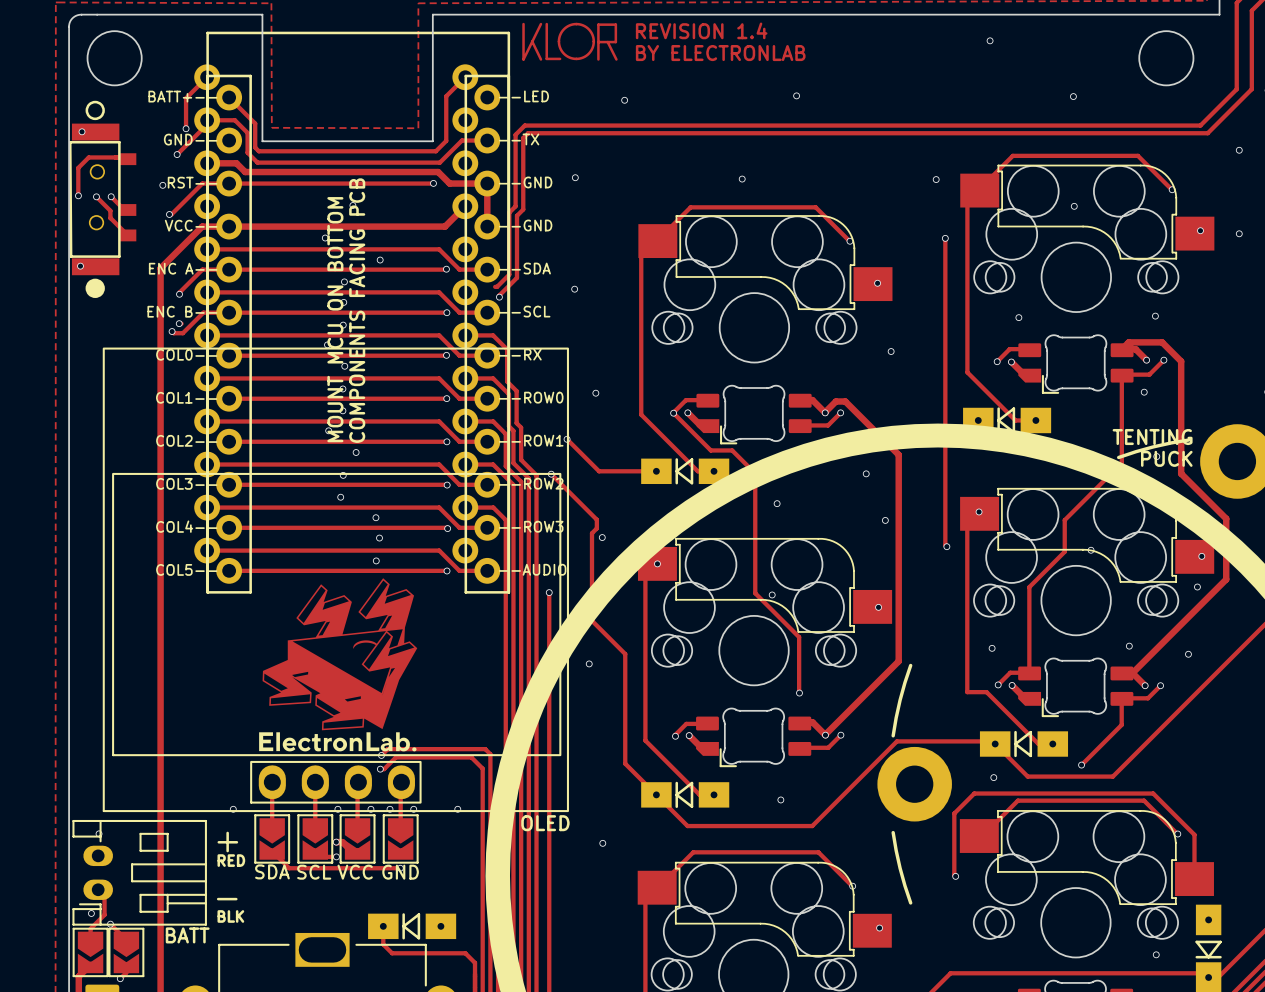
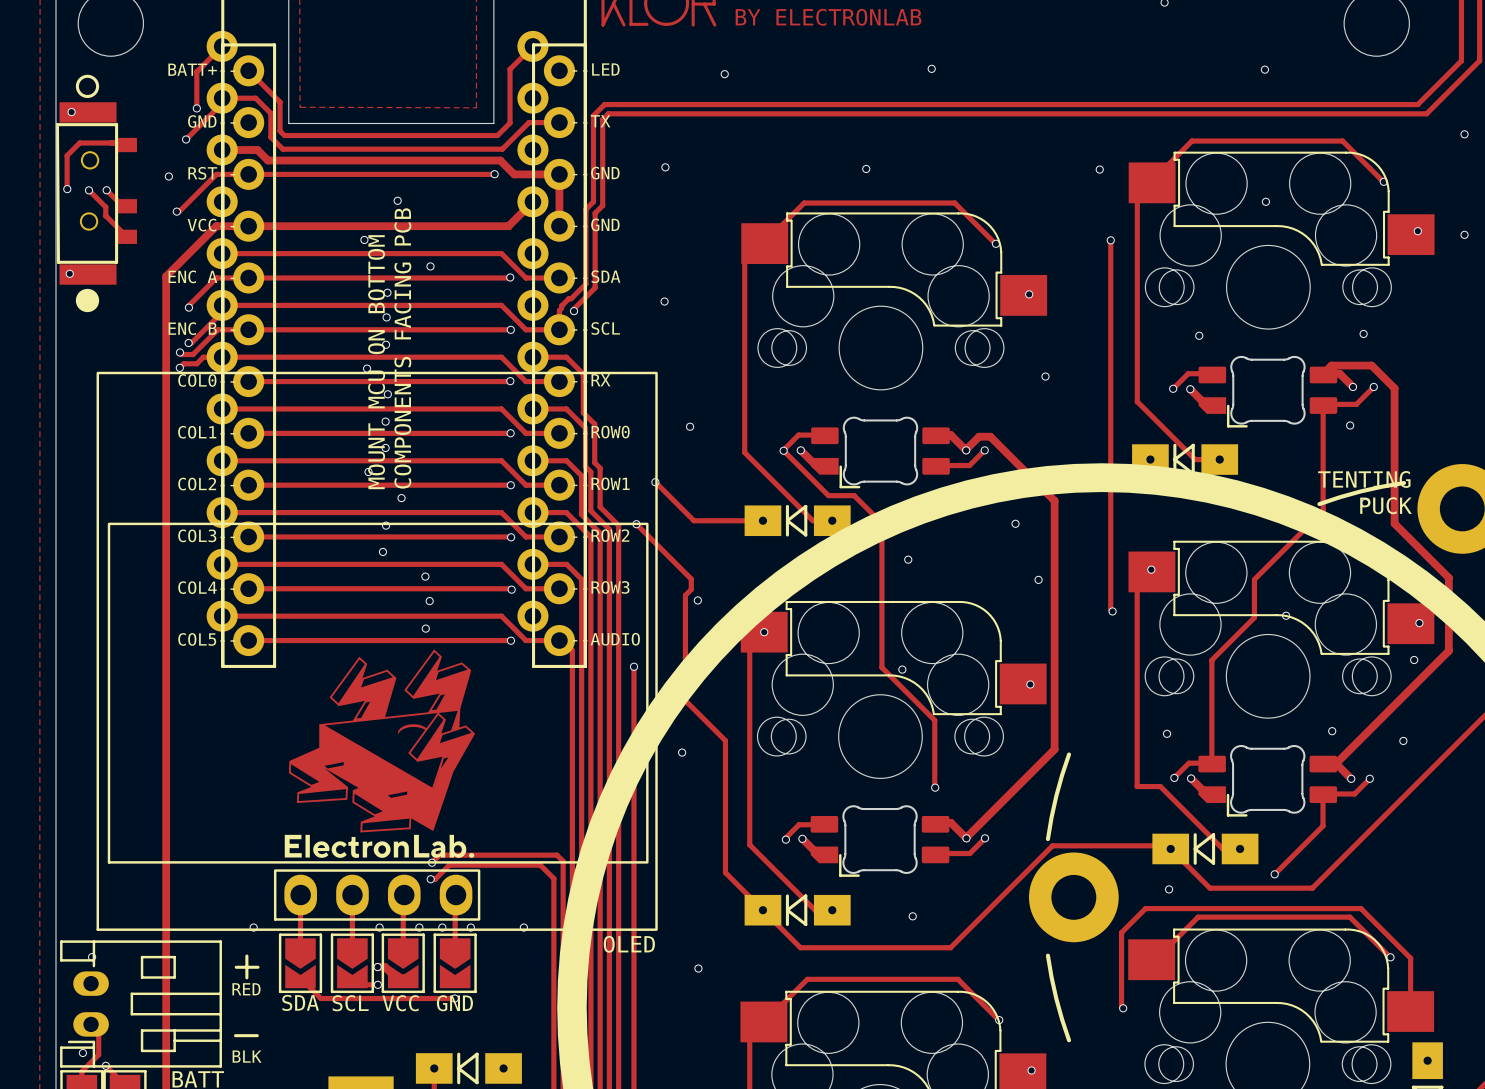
track: none -> (568, 298) (559, 310) (559, 329)
track: none -> (222, 312) (191, 343)
track: none -> (222, 357) (203, 357) (196, 363) (183, 363) (179, 367)
via: none -> (179, 367)
track: none -> (562, 640) (572, 650) (572, 906)

